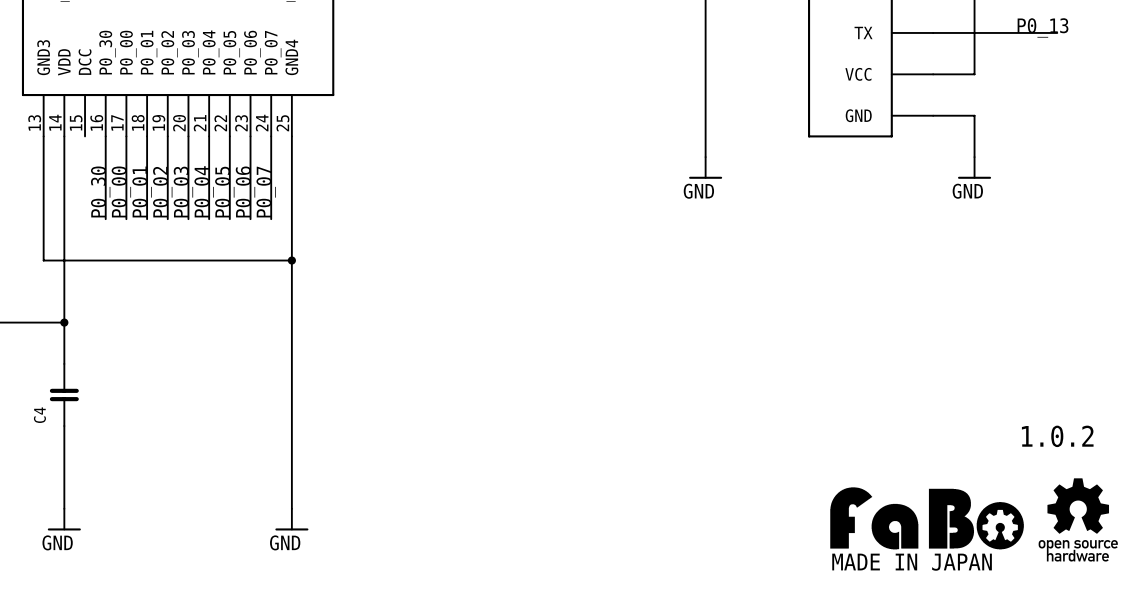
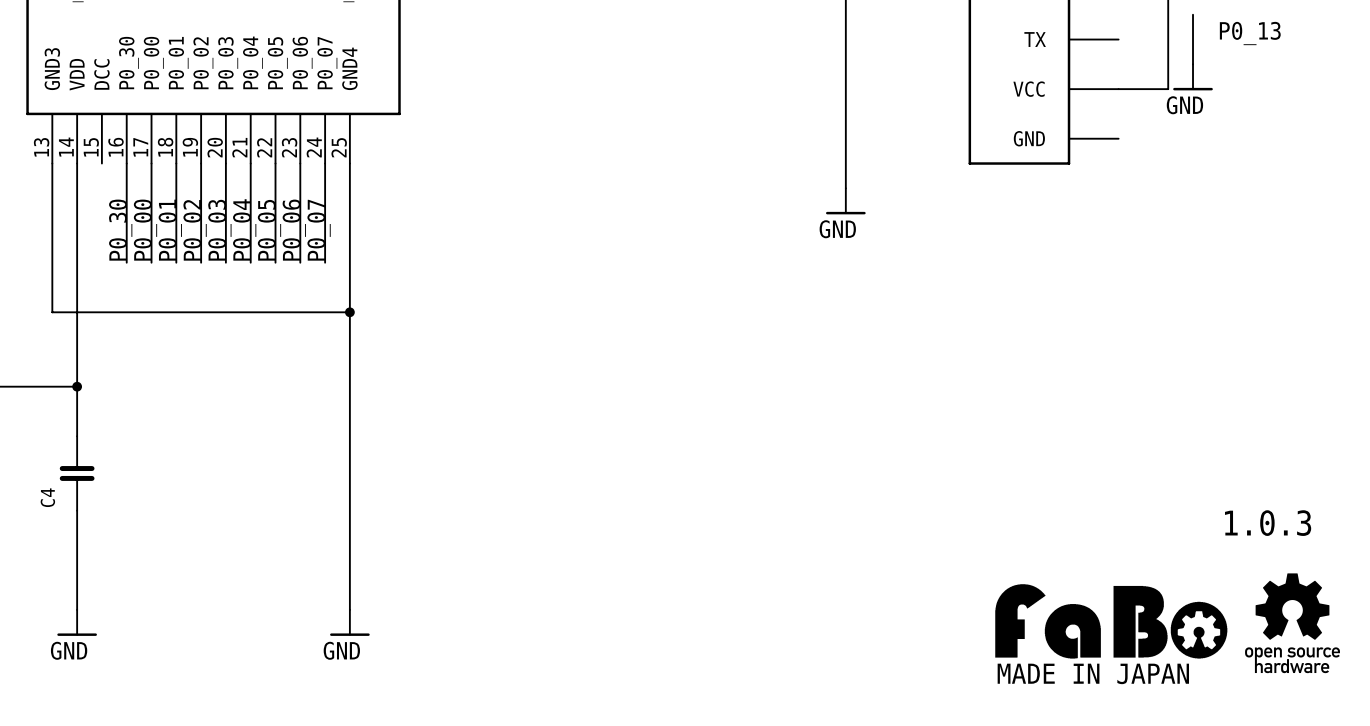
wire: none -> (1193, 14) (1193, 64)
wire: (933, 32) (1057, 32) -> none
wire: (933, 115) (974, 115) (974, 157) -> none
power symbol position: GND (974, 167) -> GND (1193, 77)
text: 1.0.2 (1057, 436) -> 1.0.3 (1268, 523)

